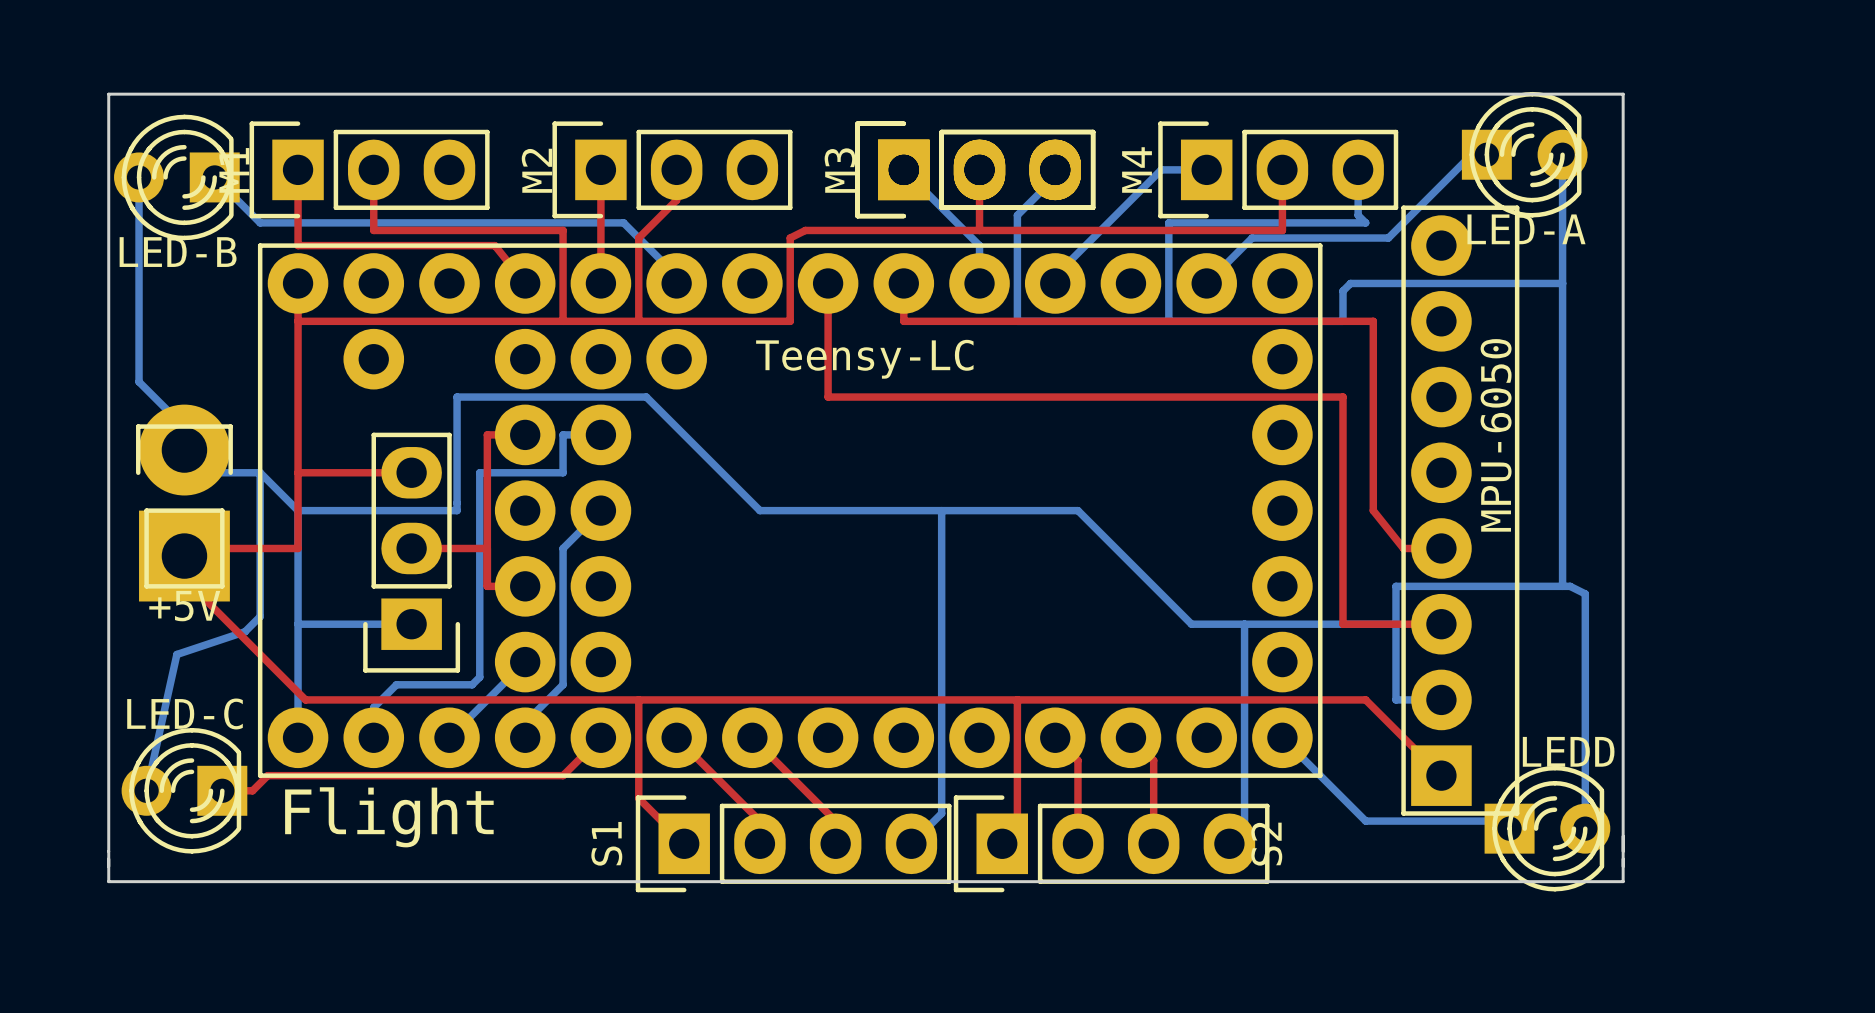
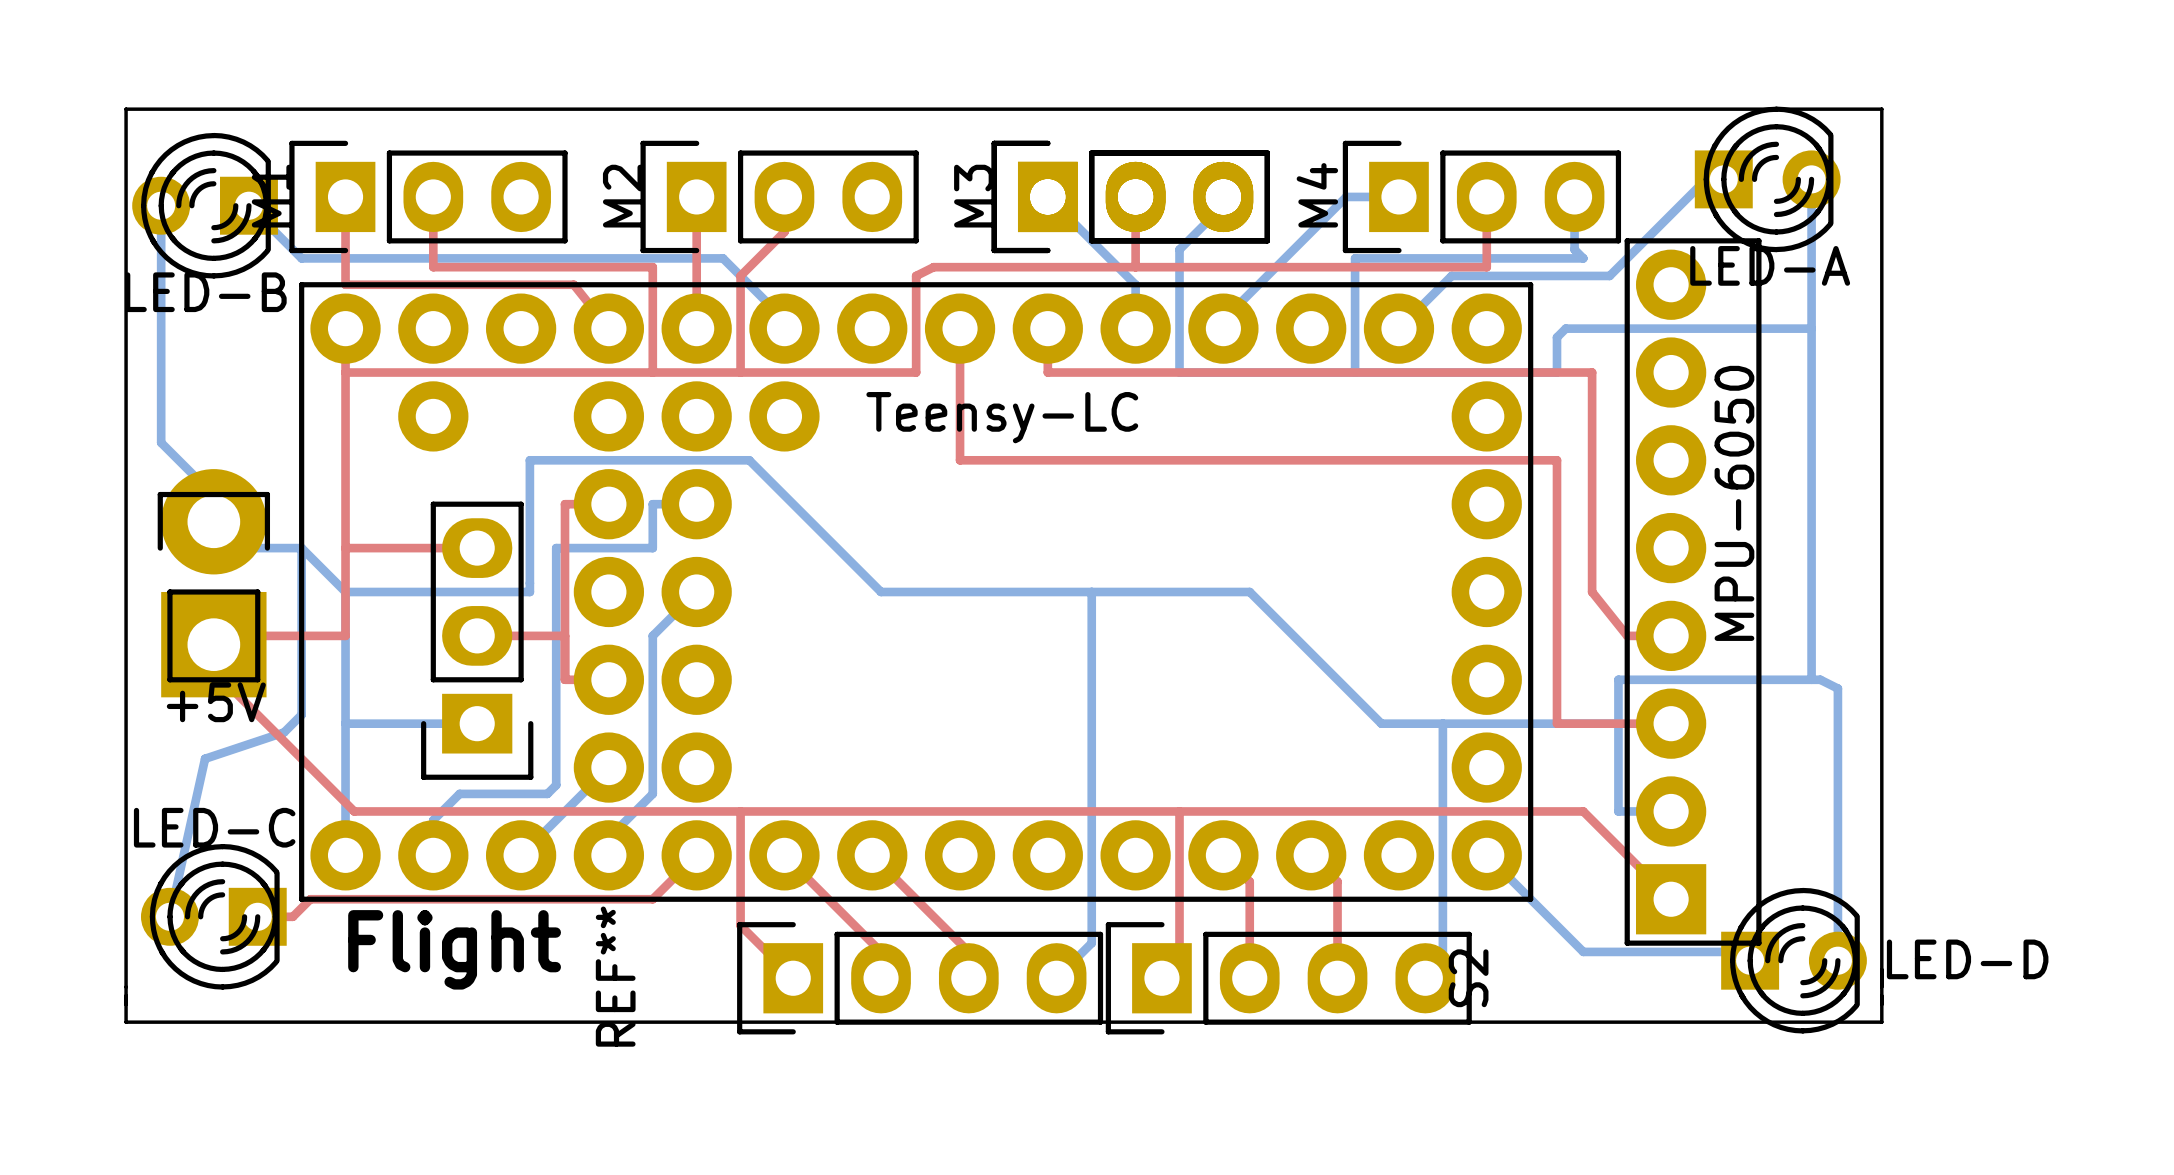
part value: LEDD (1568, 751) -> LED-D (1967, 959)
S1 name: S1 (606, 843) -> REF** (615, 976)

